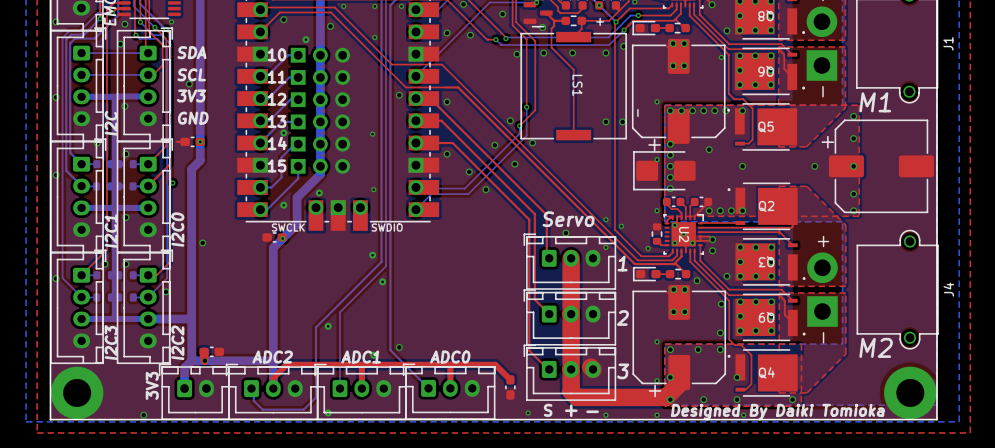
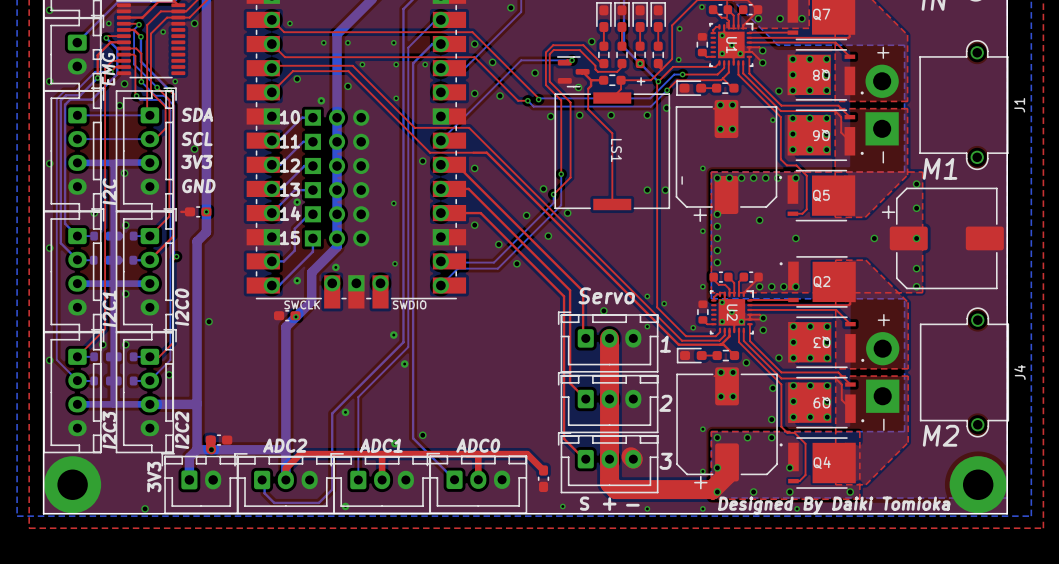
part: (664, 170) -> none

